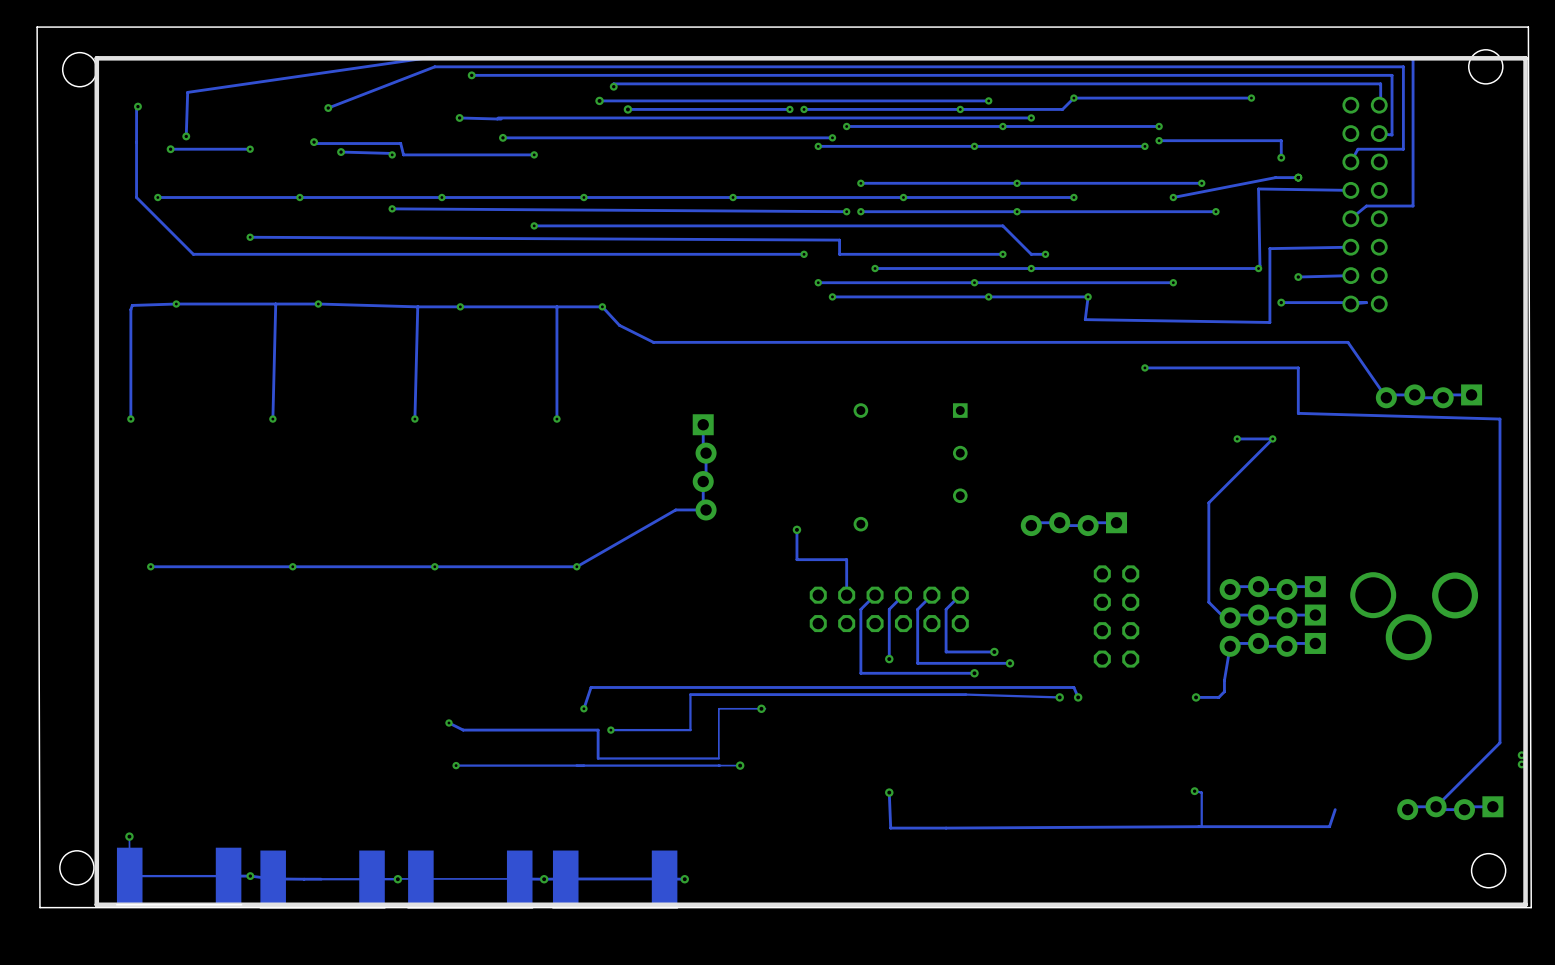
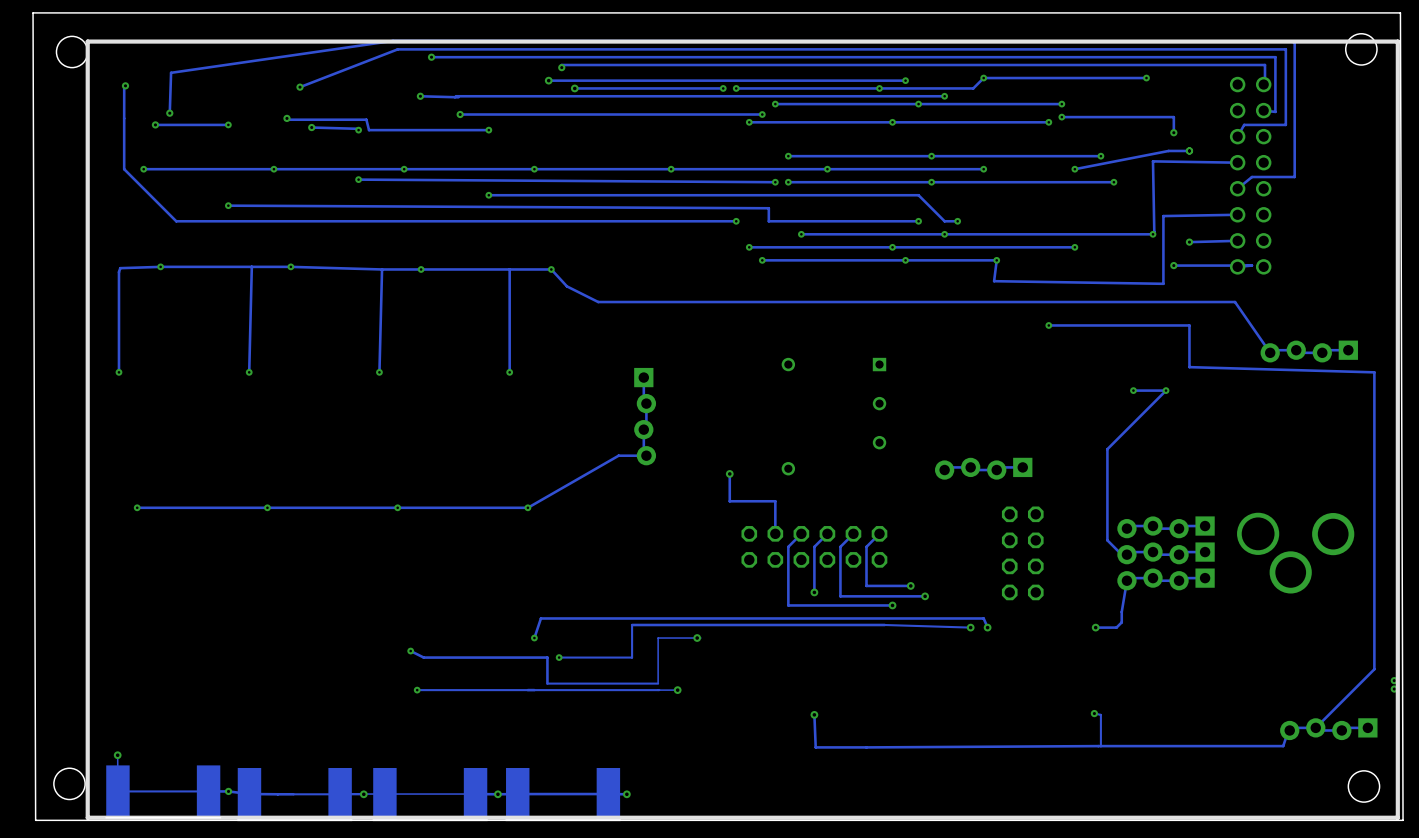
track: (1335, 809) (1329, 826) -> (1288, 730) (1283, 746) (1218, 746)

